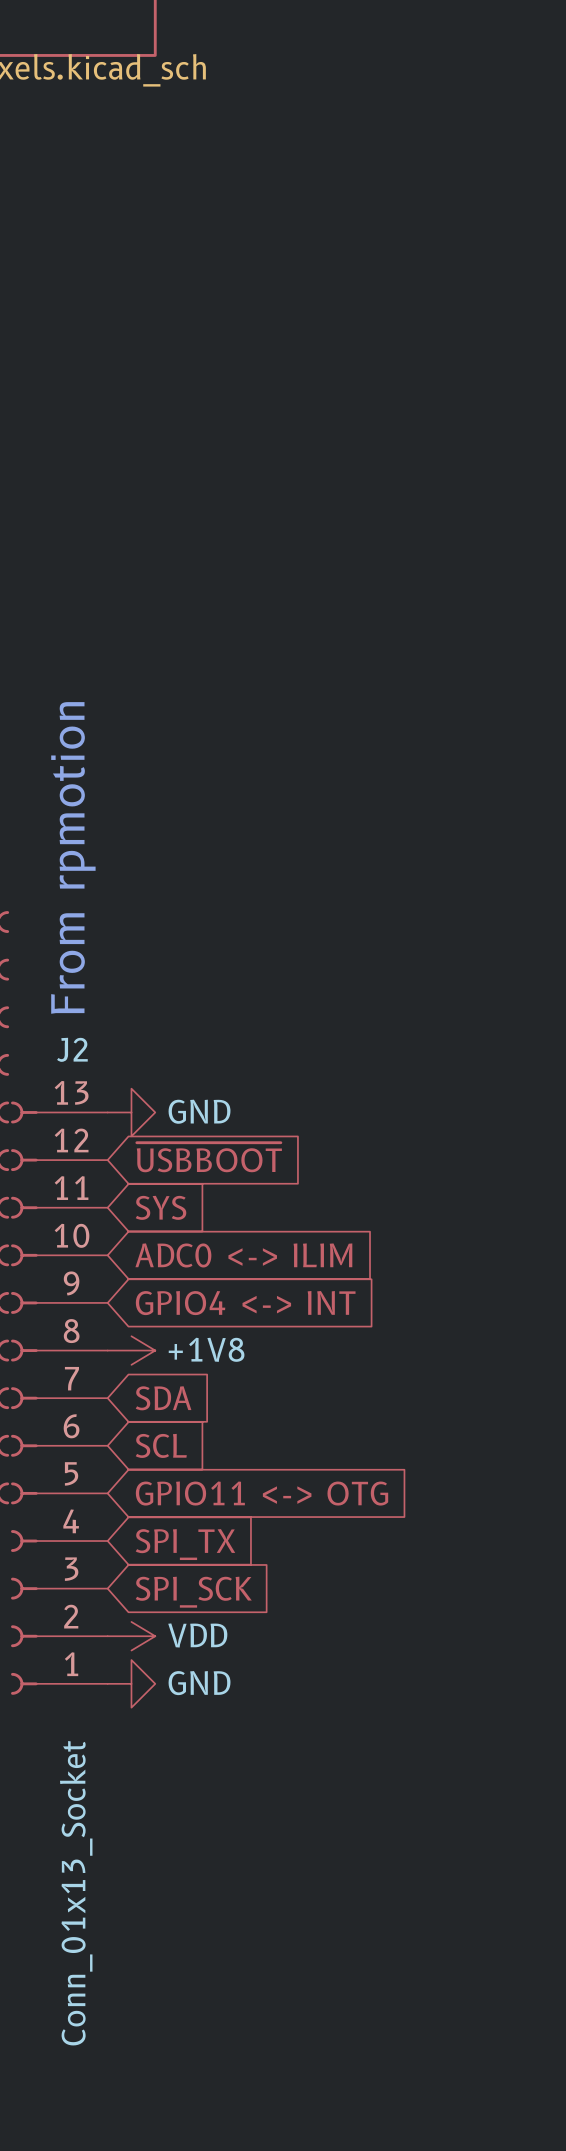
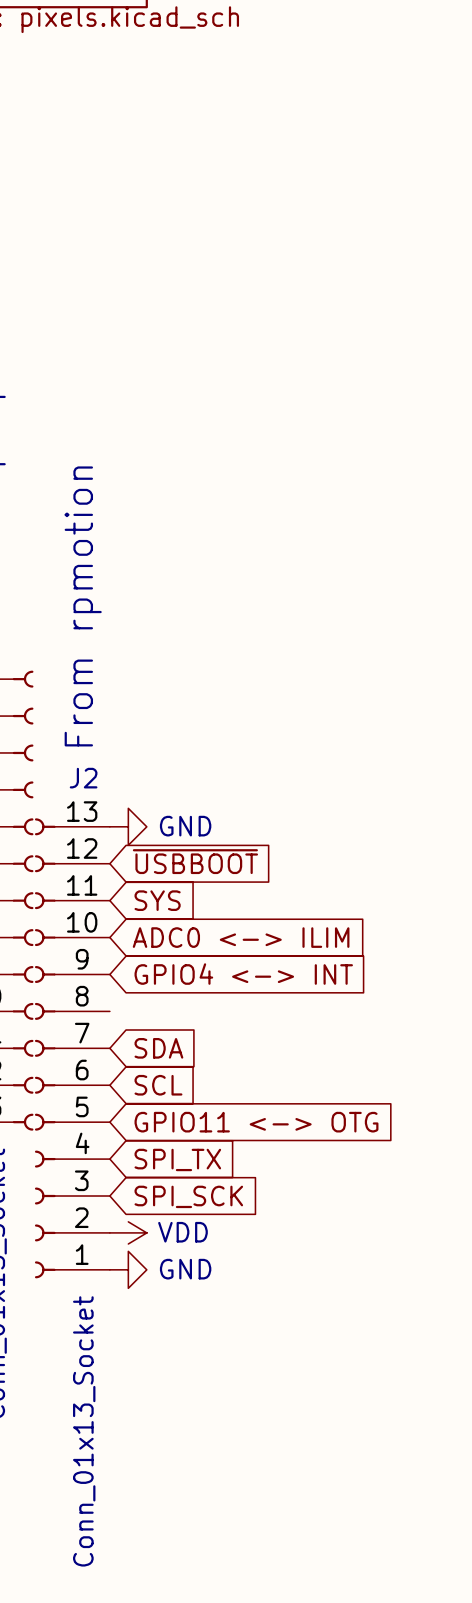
power symbol: +1V8 (131, 1350) -> none

